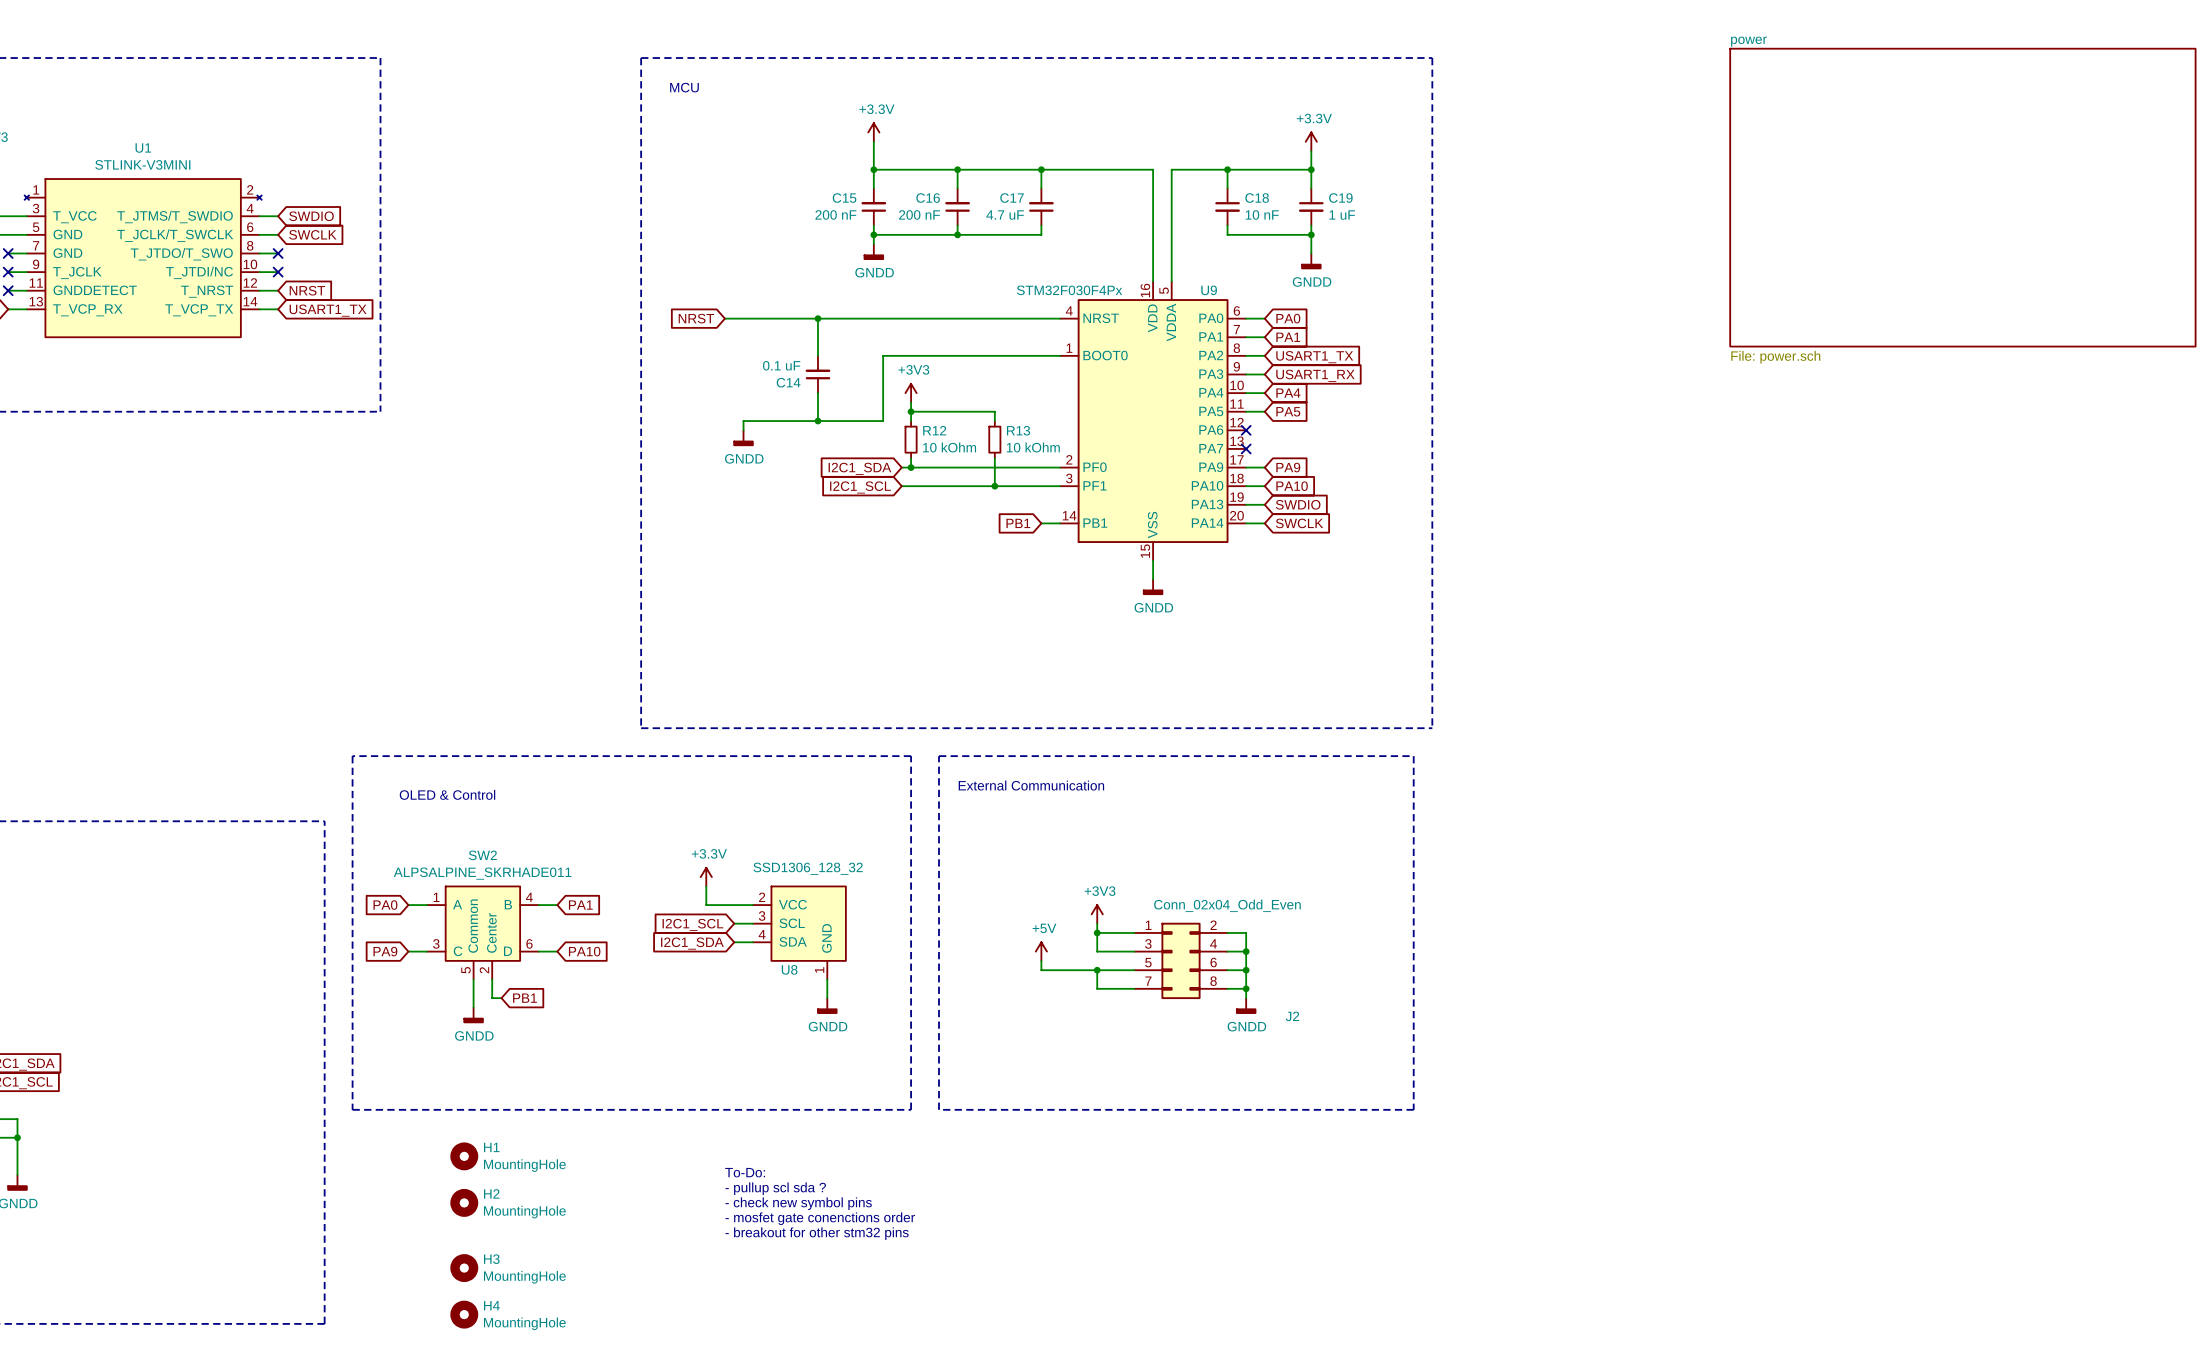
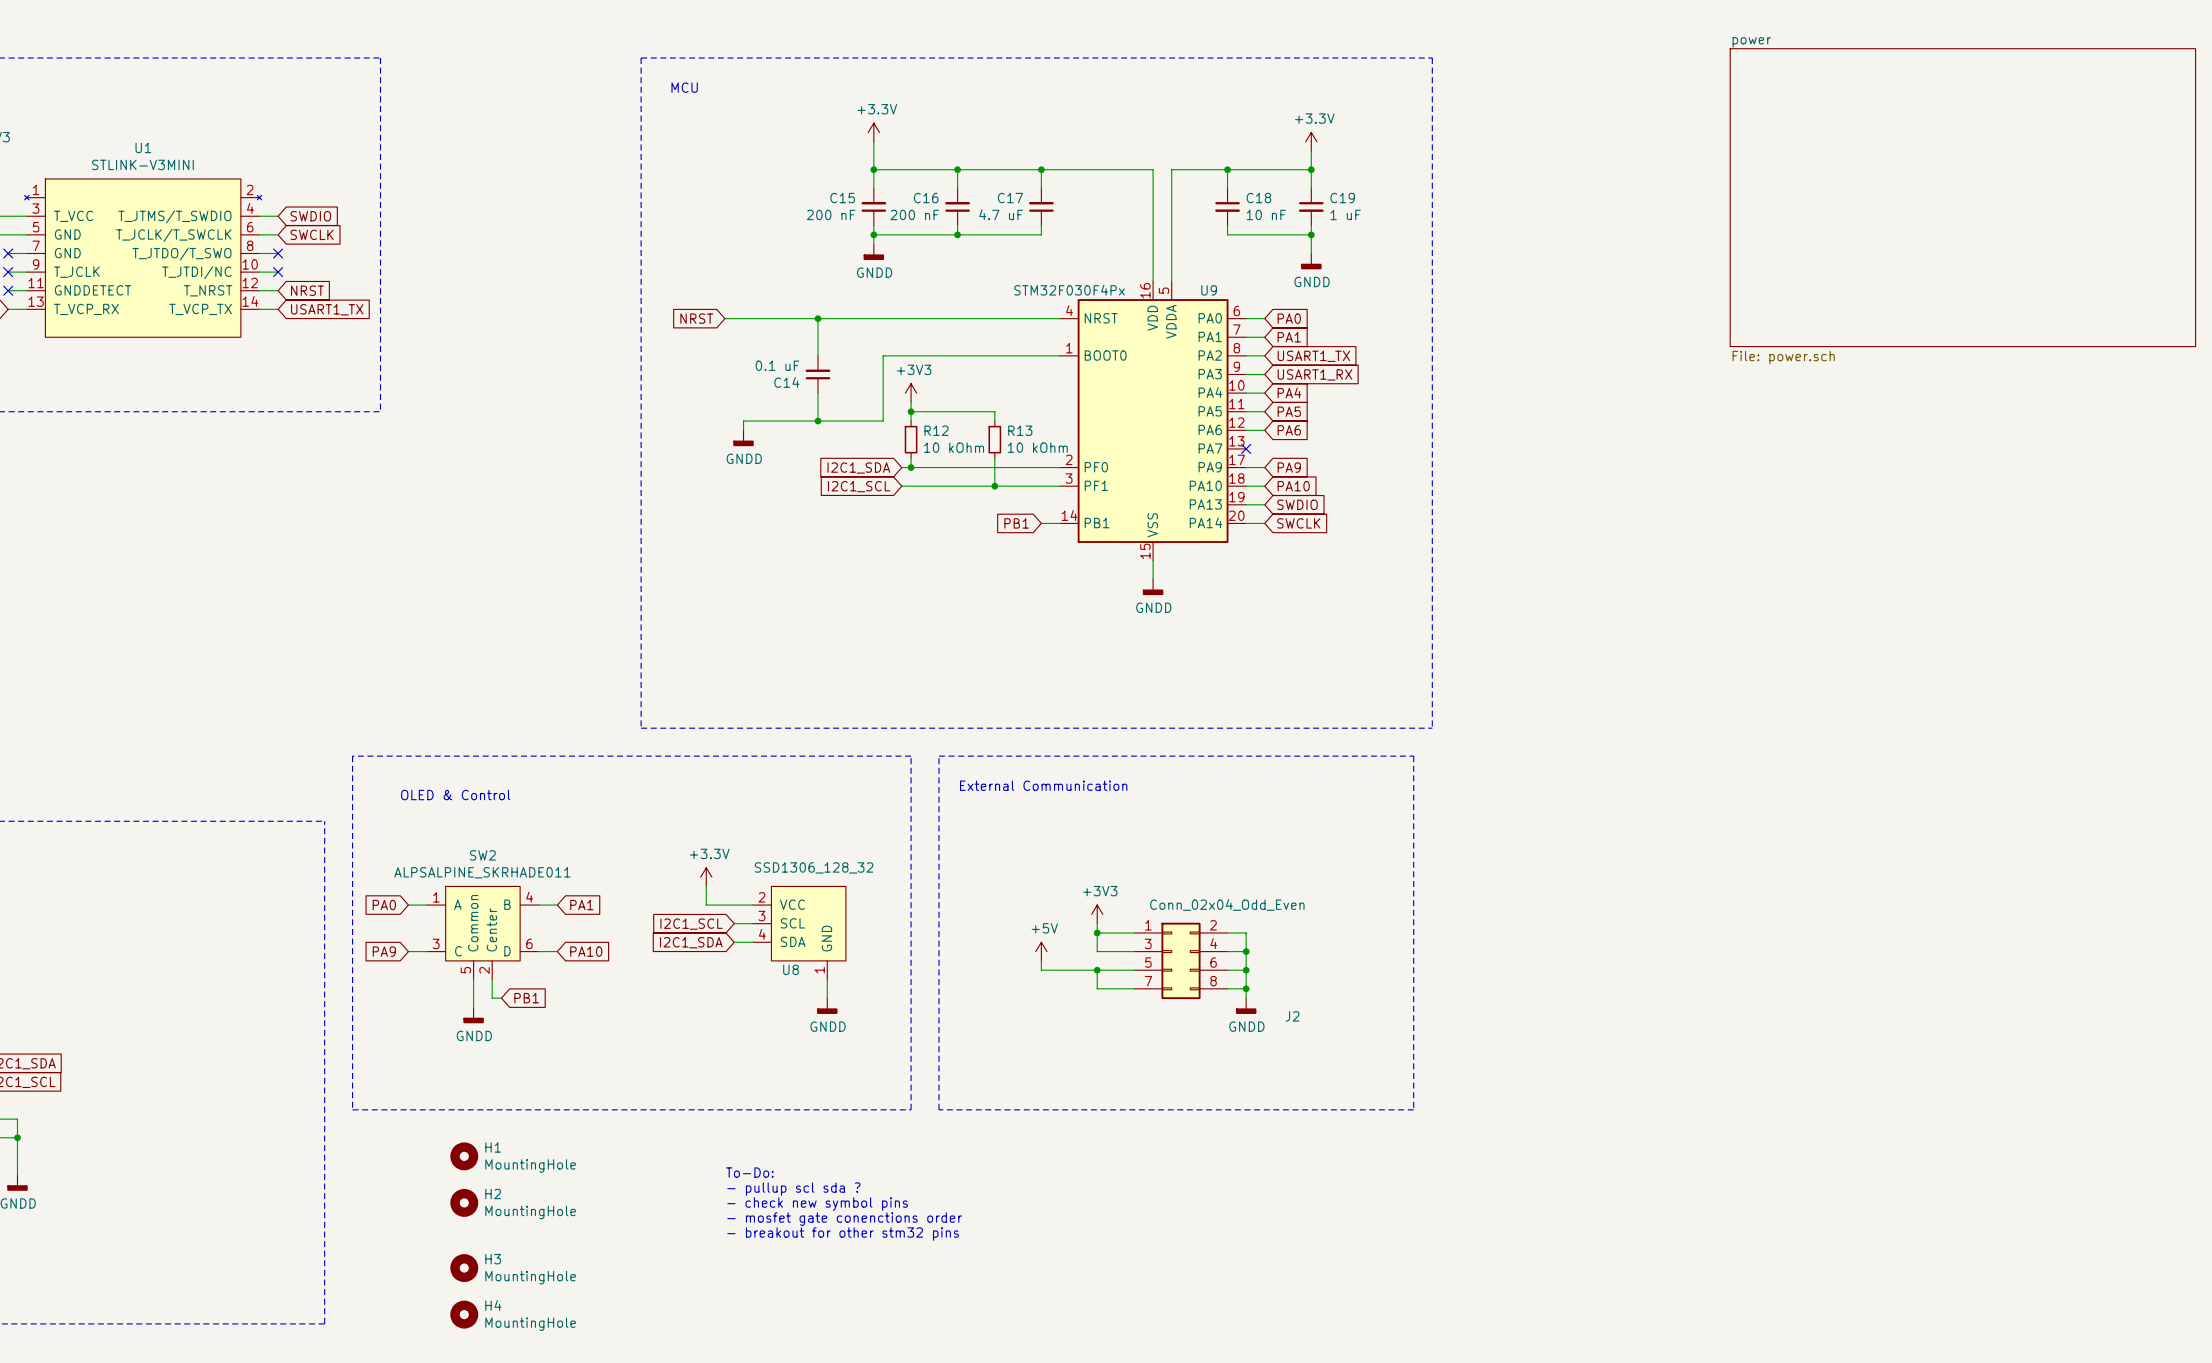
wire: none -> (1246, 430) (1264, 430)
no-connect mark: (1246, 430) -> none
global label: none -> PA6 (1289, 430)

